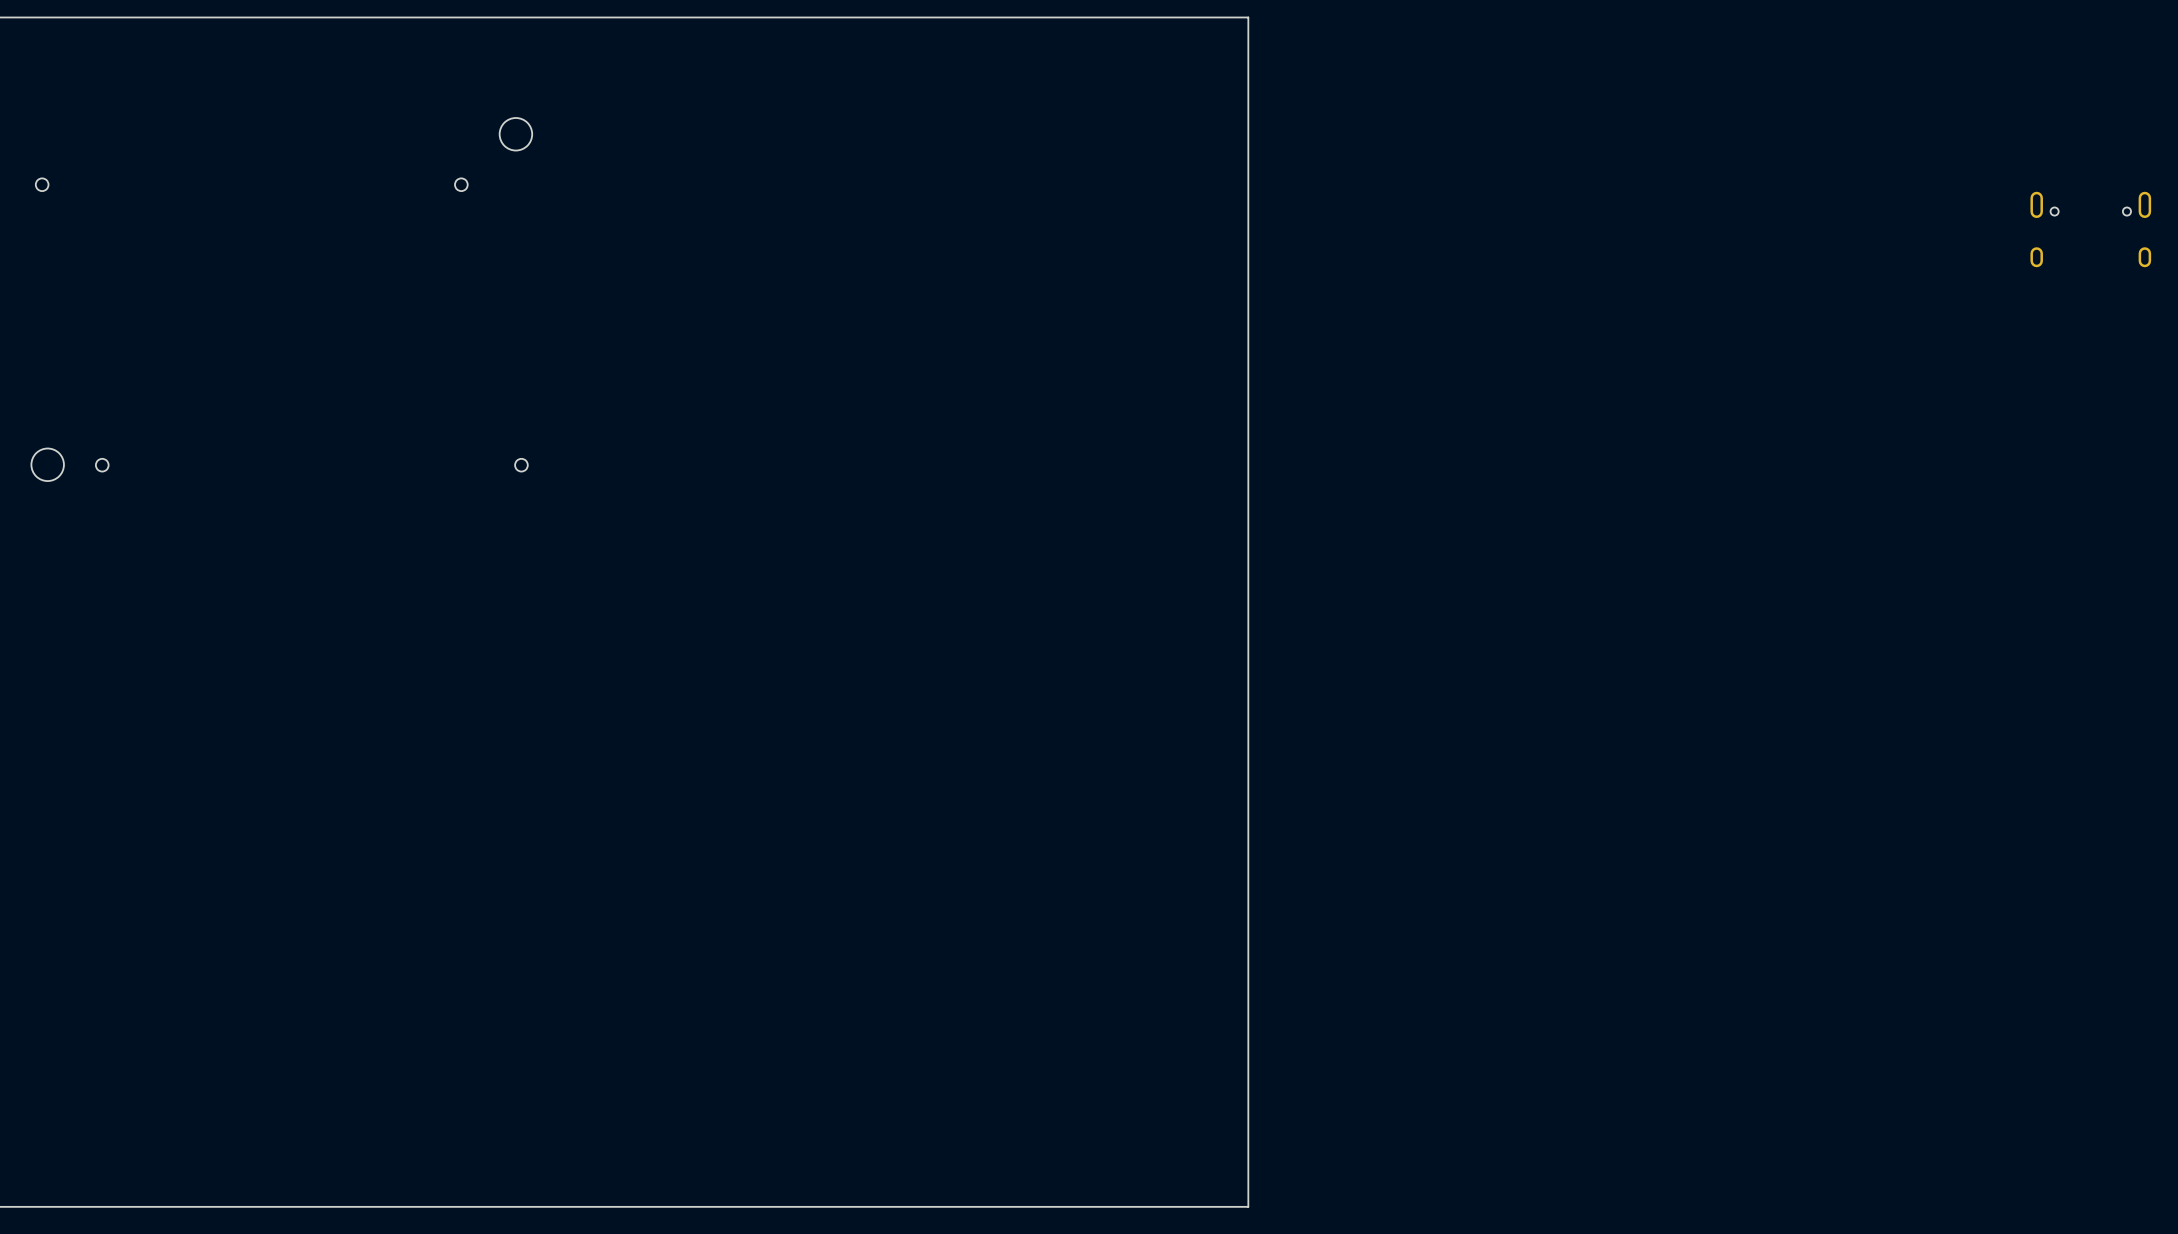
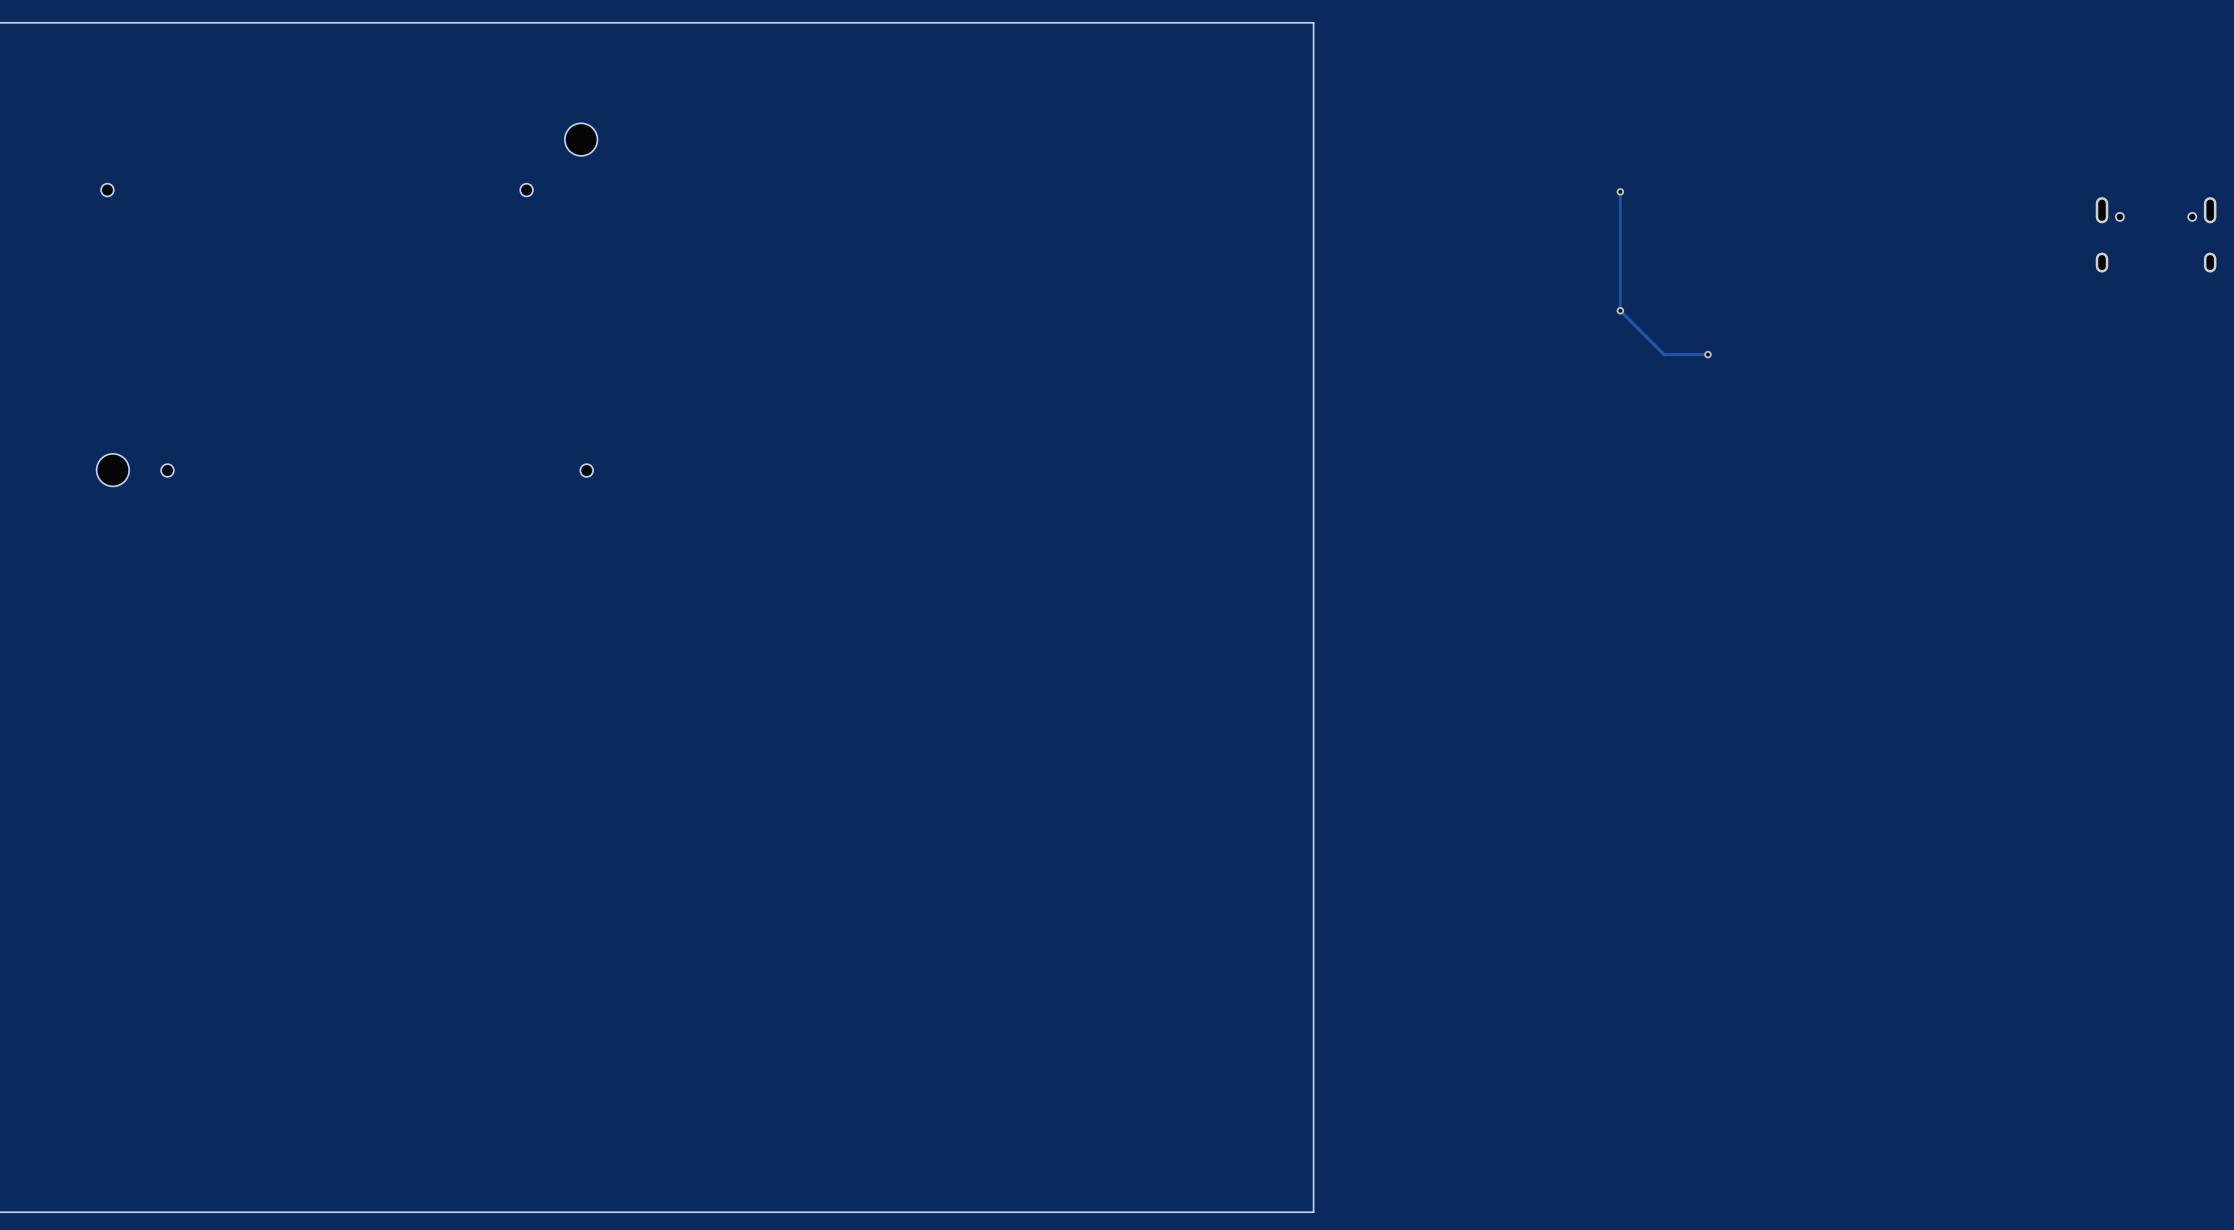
track: none -> (1620, 191) (1620, 310) (1664, 354) (1707, 354)
via: none -> (1620, 191)
via: none -> (1620, 310)
via: none -> (1707, 354)

